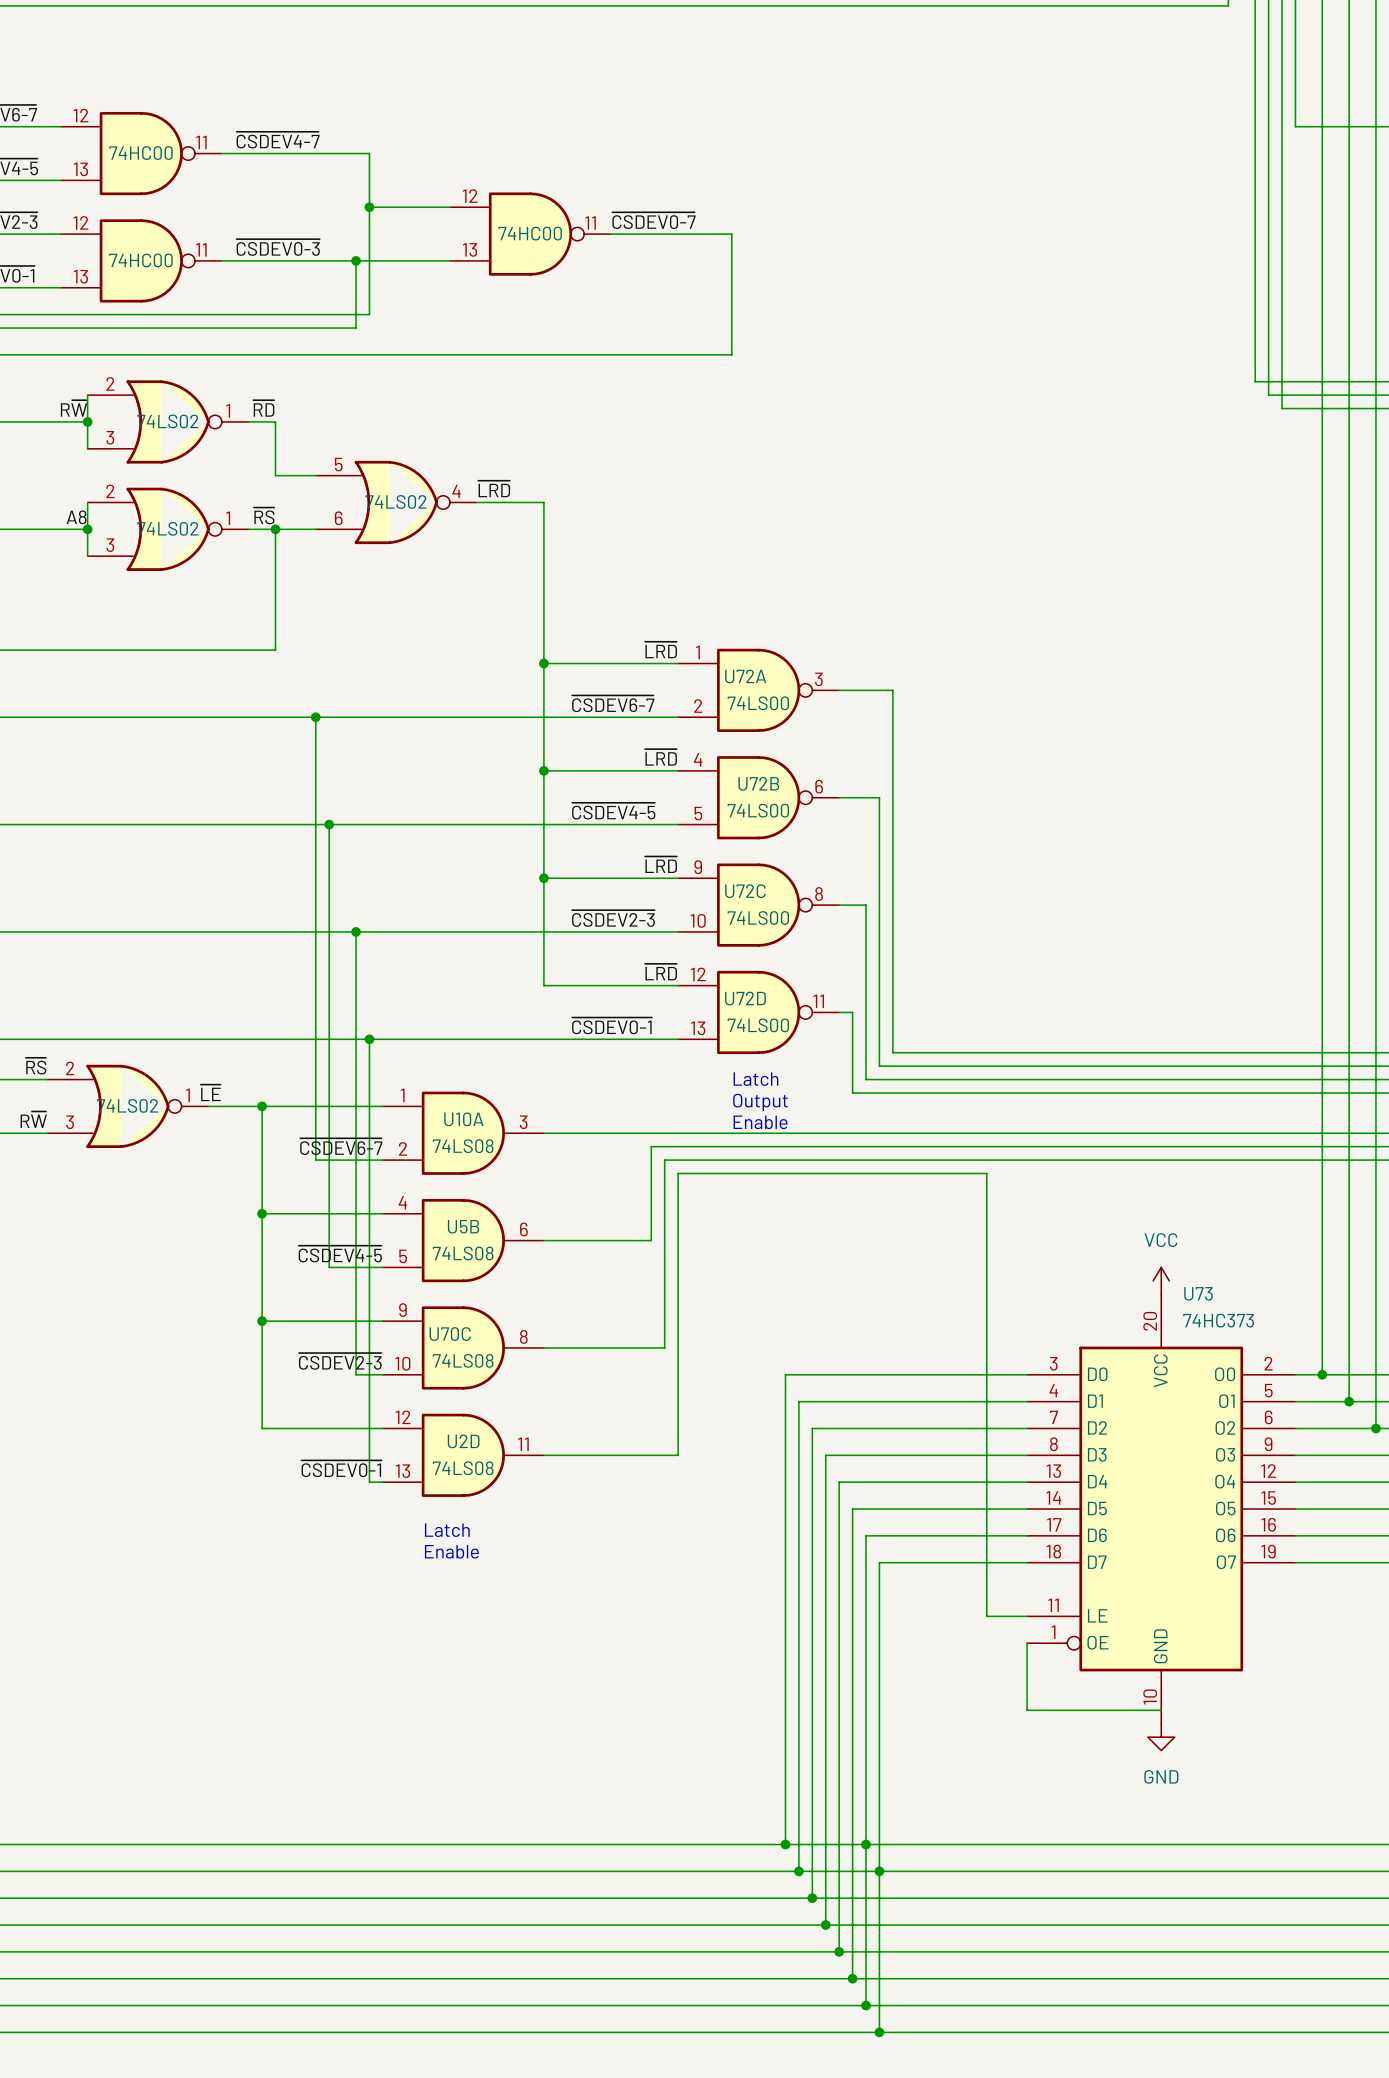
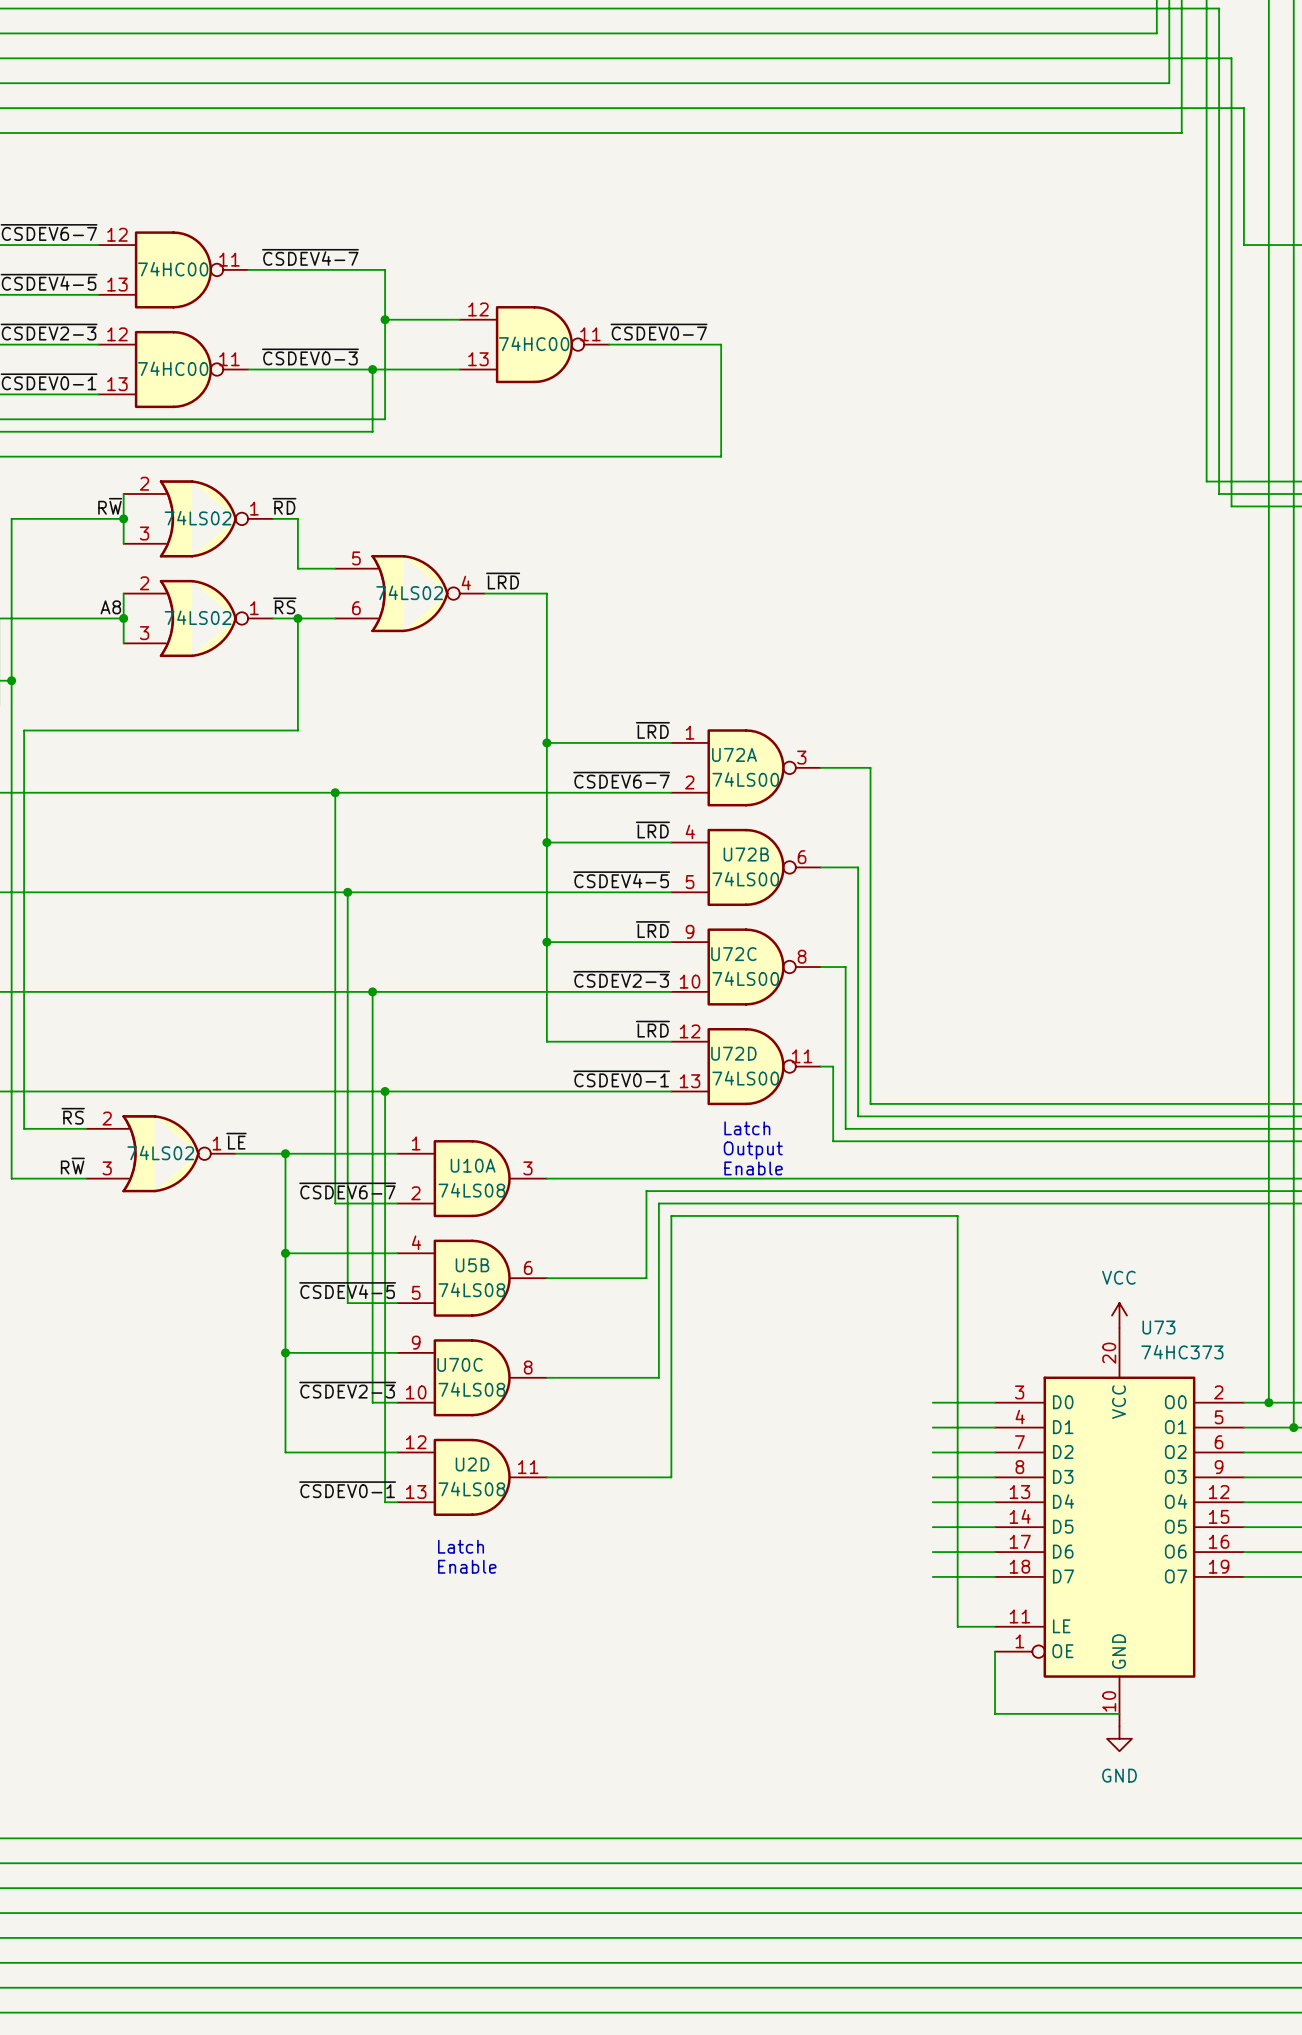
wire: (959, 1374) (785, 1374) (785, 1844) -> none
wire: (959, 1401) (798, 1401) (798, 1871) -> none
wire: (959, 1428) (812, 1428) (812, 1898) -> none
wire: (959, 1455) (825, 1455) (825, 1925) -> none
wire: (959, 1482) (839, 1482) (839, 1951) -> none
wire: (959, 1509) (852, 1509) (852, 1978) -> none
wire: (959, 1535) (866, 1535) (866, 2005) -> none
wire: (959, 1562) (879, 1562) (879, 2032) -> none
junction: (785, 1844) -> none
junction: (866, 1844) -> none
junction: (798, 1871) -> none
junction: (879, 1871) -> none
junction: (812, 1898) -> none
junction: (825, 1925) -> none
junction: (839, 1951) -> none
junction: (852, 1978) -> none
junction: (866, 2005) -> none
junction: (879, 2032) -> none

